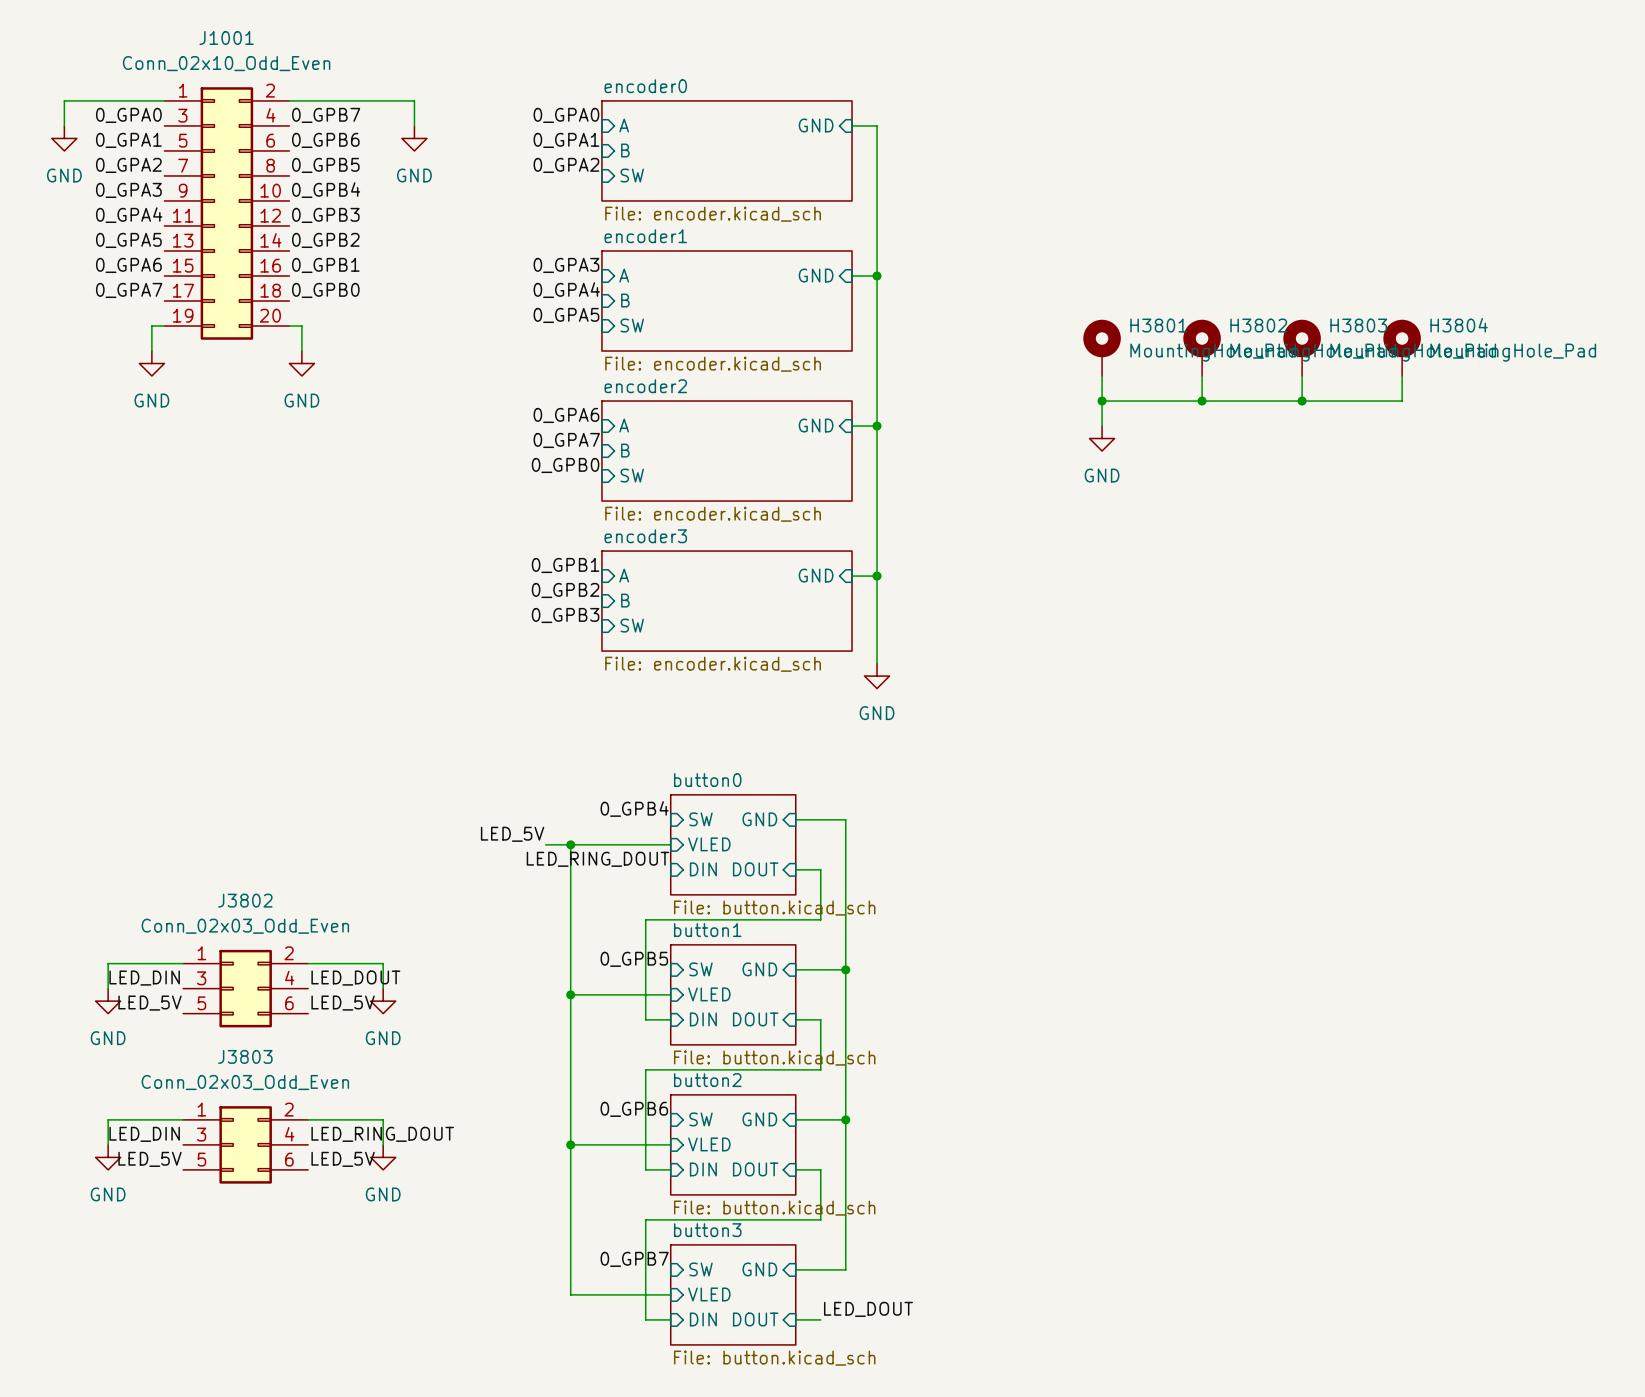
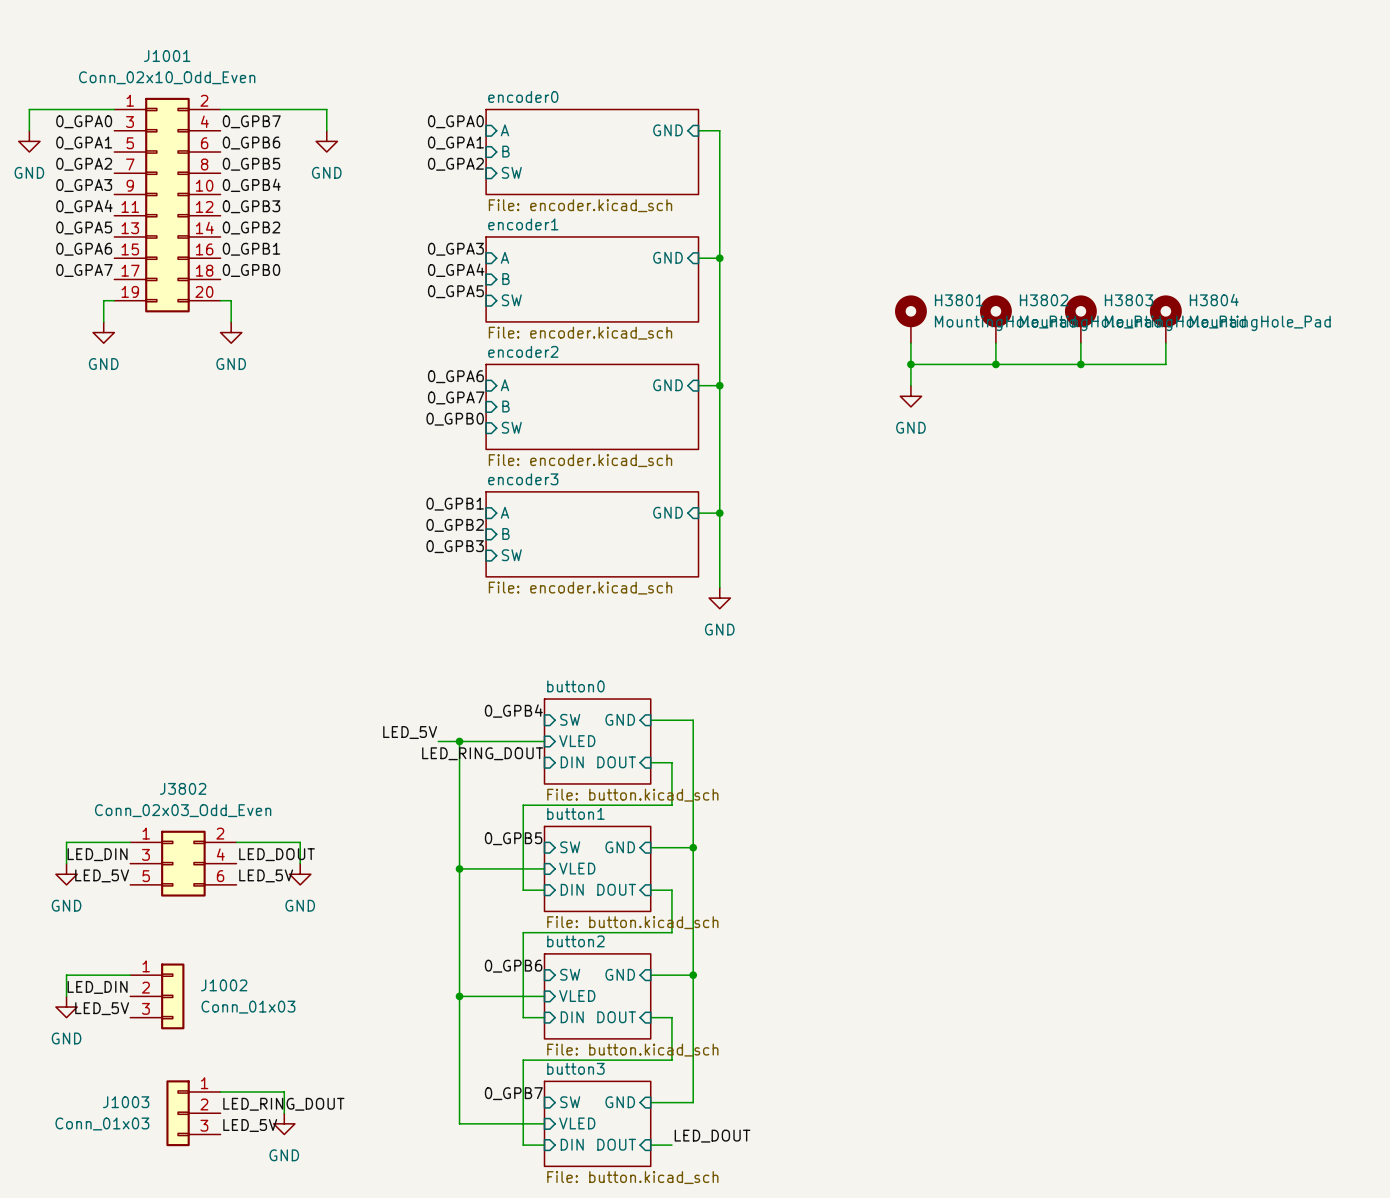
wire: (308, 1119) (383, 1119) (383, 1144) -> (220, 1091) (284, 1091) (284, 1113)
label position: LED_RING_DOUT (382, 1134) -> LED_RING_DOUT (283, 1104)
J1002: none -> Conn_01x03 (157, 996)
J3803: Conn_02x03_Odd_Even (245, 1144) -> none
power symbol position: GND (383, 1157) -> GND (284, 1123)
label position: LED_5V (343, 1159) -> LED_5V (250, 1125)
J1003: none -> Conn_01x03 (193, 1113)

